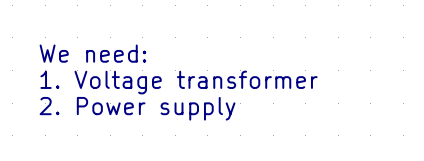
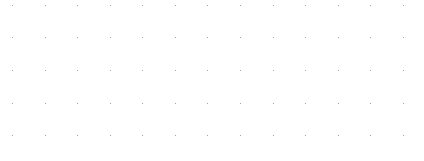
text: We need: (92, 53) -> none
text: 1. Voltage transformer (179, 82) -> none
text: 2. Power supply (137, 108) -> none

